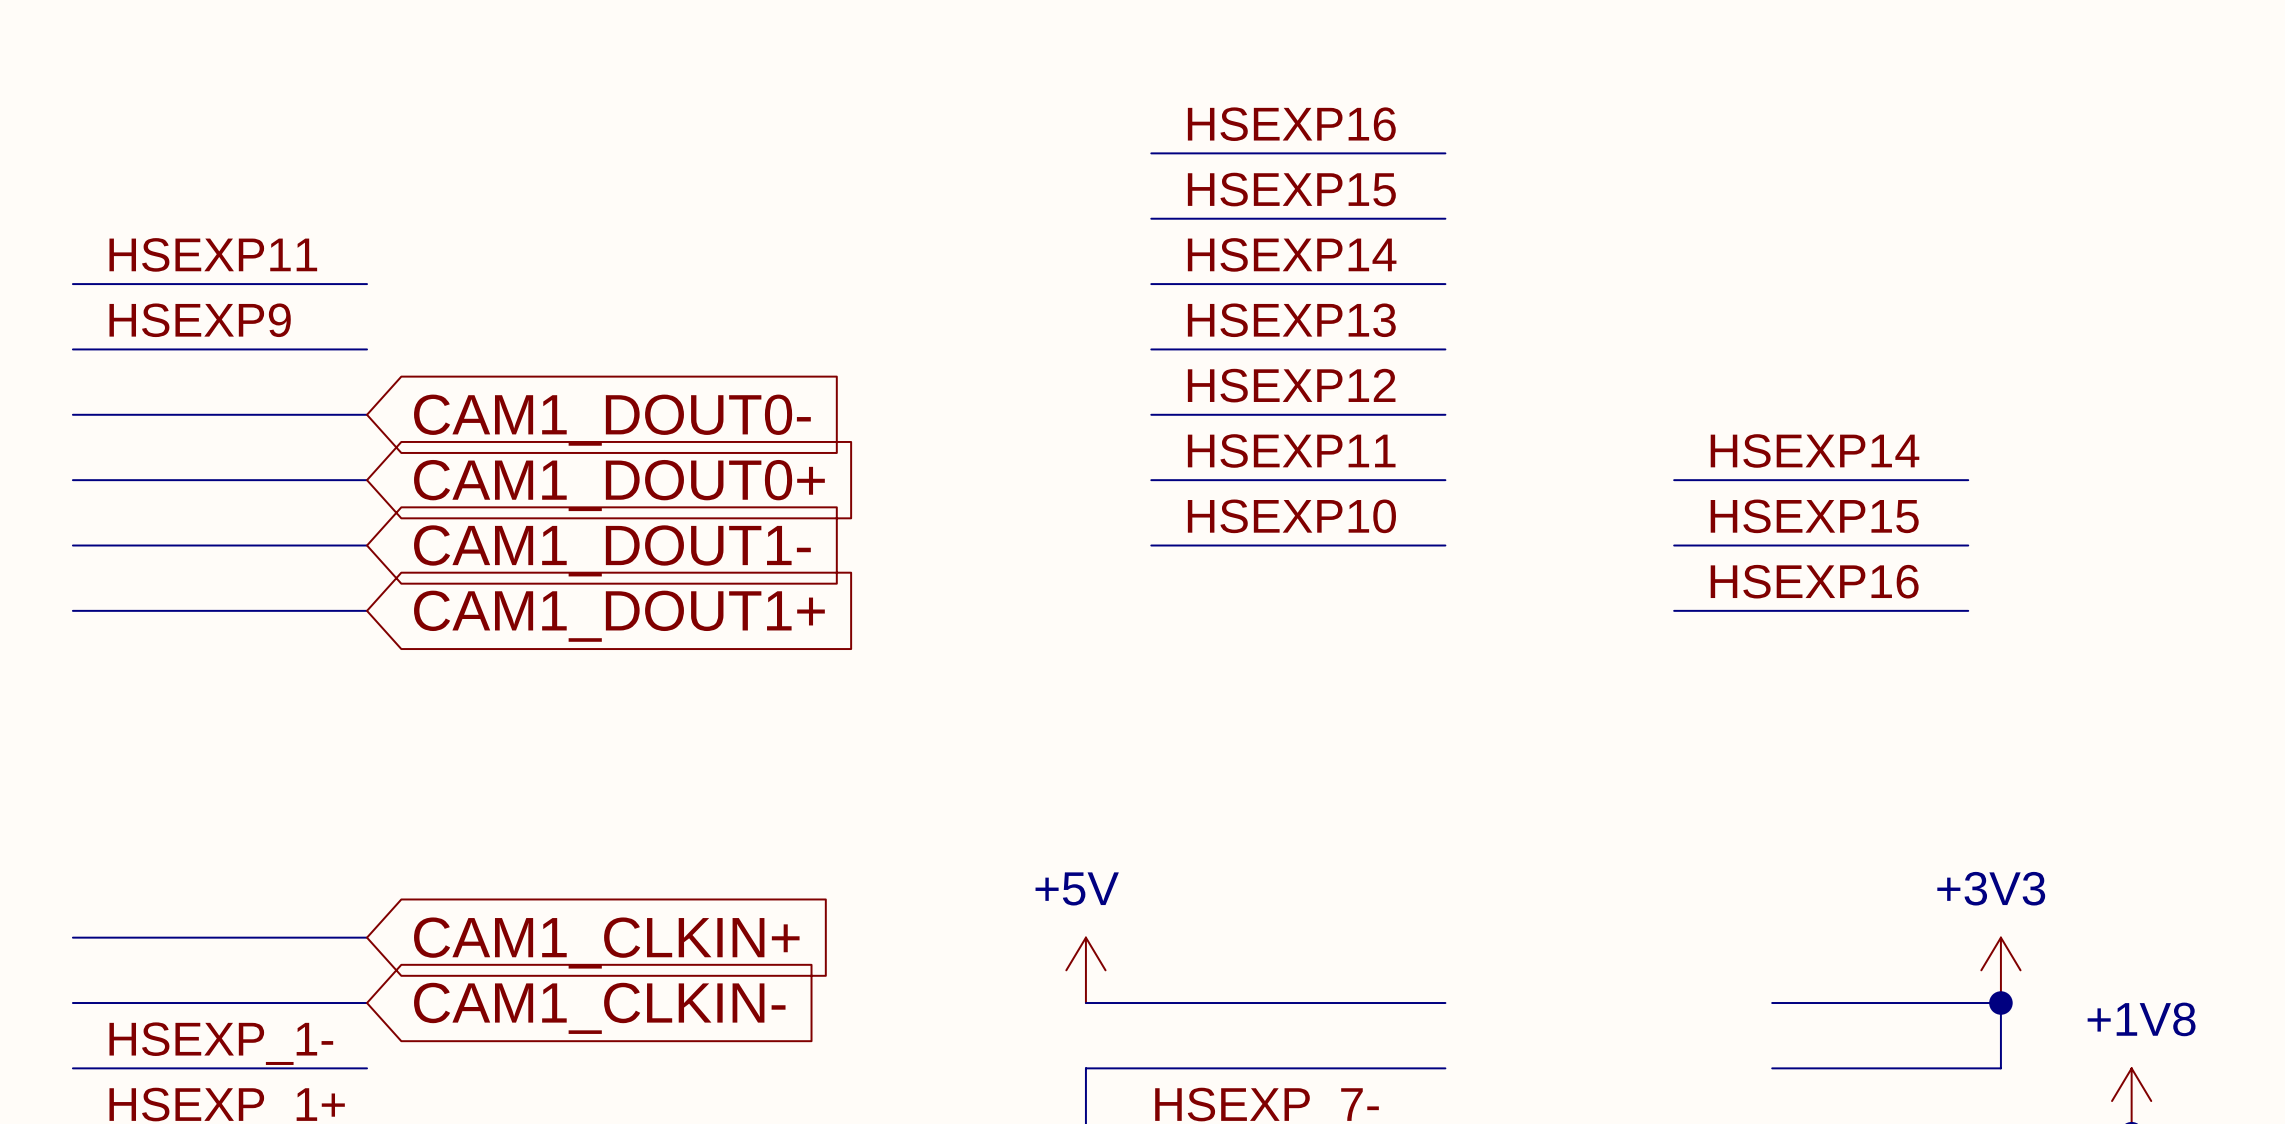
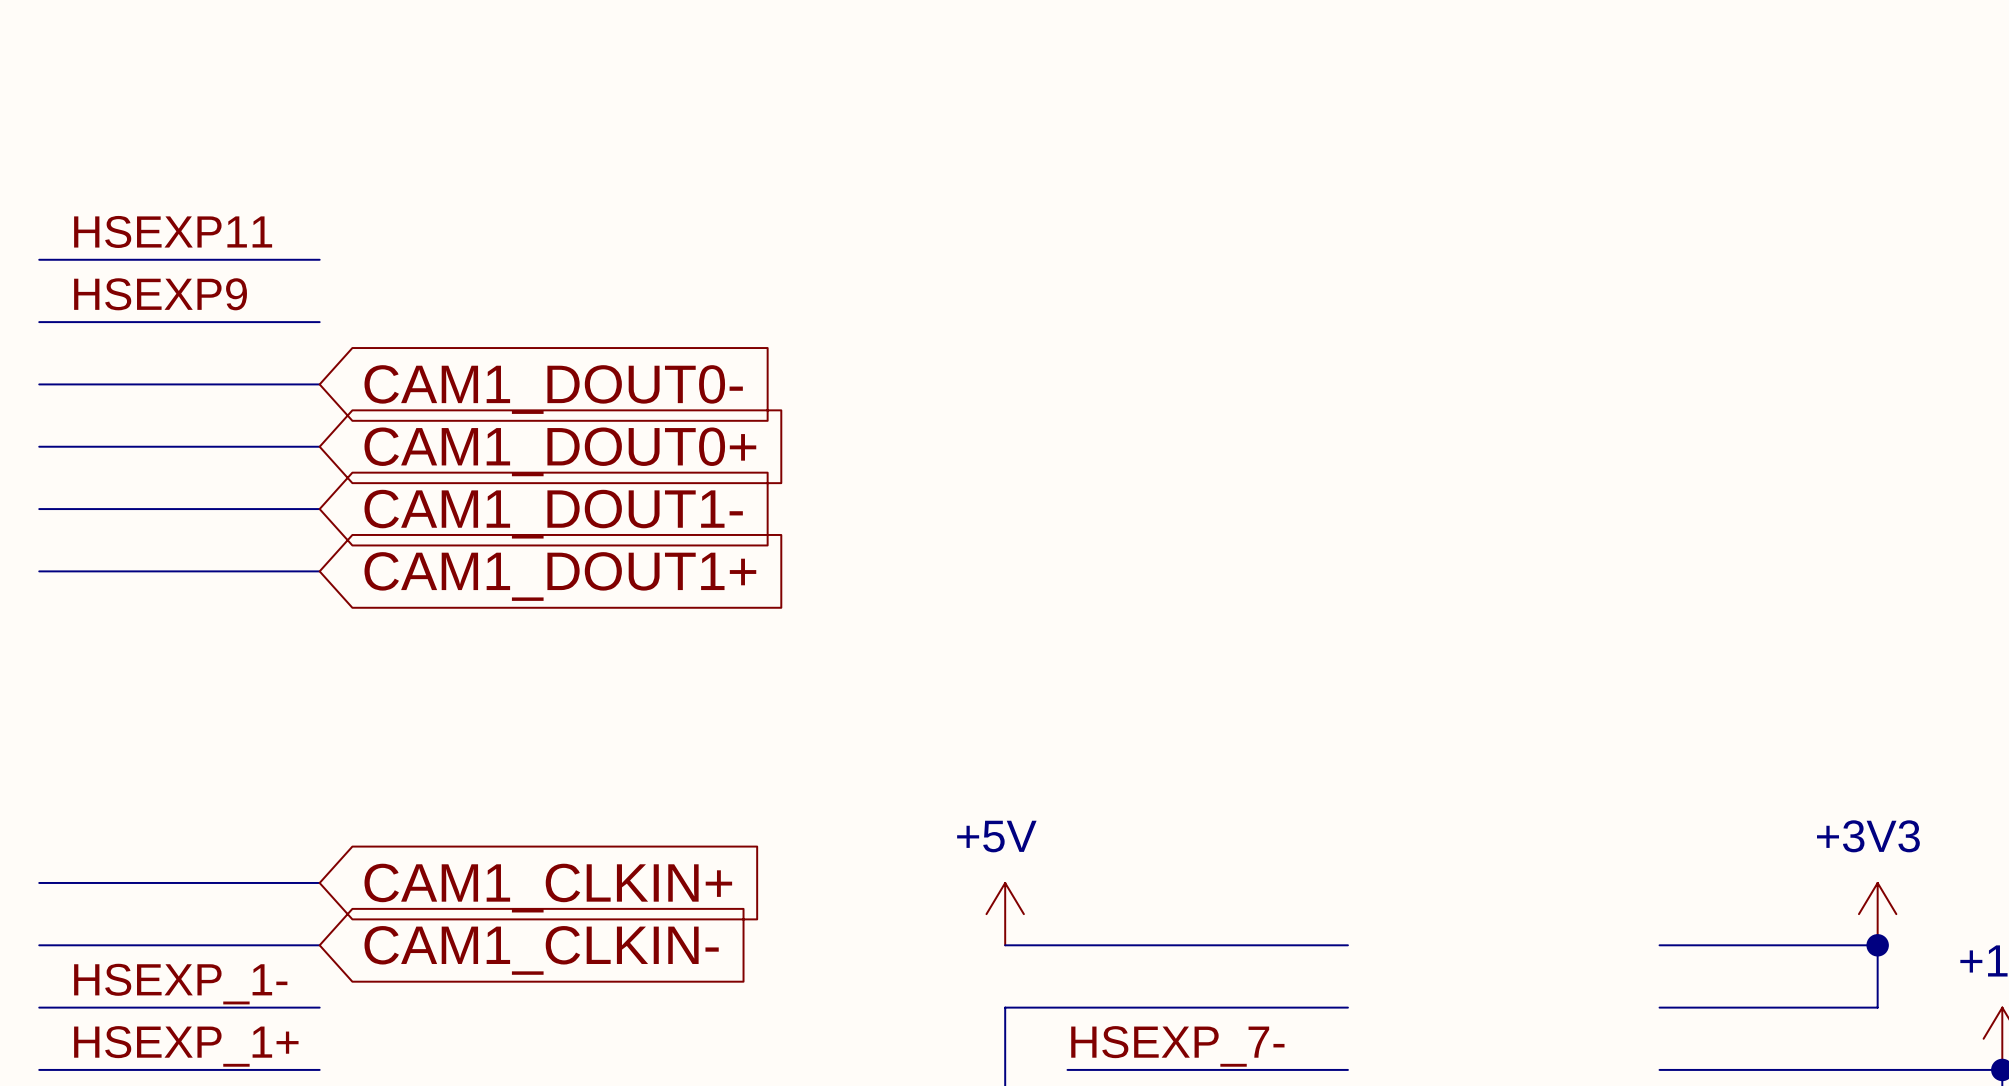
label: HSEXP16 (1291, 124) -> none
wire: (1151, 153) (1445, 153) -> none
label: HSEXP15 (1291, 189) -> none
wire: (1151, 218) (1445, 218) -> none
label: HSEXP14 (1292, 254) -> none
wire: (1151, 284) (1445, 284) -> none
label: HSEXP13 (1291, 320) -> none
wire: (1151, 349) (1445, 349) -> none
label: HSEXP12 (1291, 385) -> none
wire: (1151, 414) (1445, 414) -> none
label: HSEXP11 (1291, 450) -> none
label: HSEXP14 (1815, 450) -> none
wire: (1151, 480) (1445, 480) -> none
wire: (1674, 480) (1968, 480) -> none
label: HSEXP10 (1291, 516) -> none
label: HSEXP15 (1814, 516) -> none
wire: (1151, 545) (1445, 545) -> none
wire: (1674, 545) (1968, 545) -> none
label: HSEXP16 (1814, 581) -> none
wire: (1674, 610) (1968, 610) -> none

